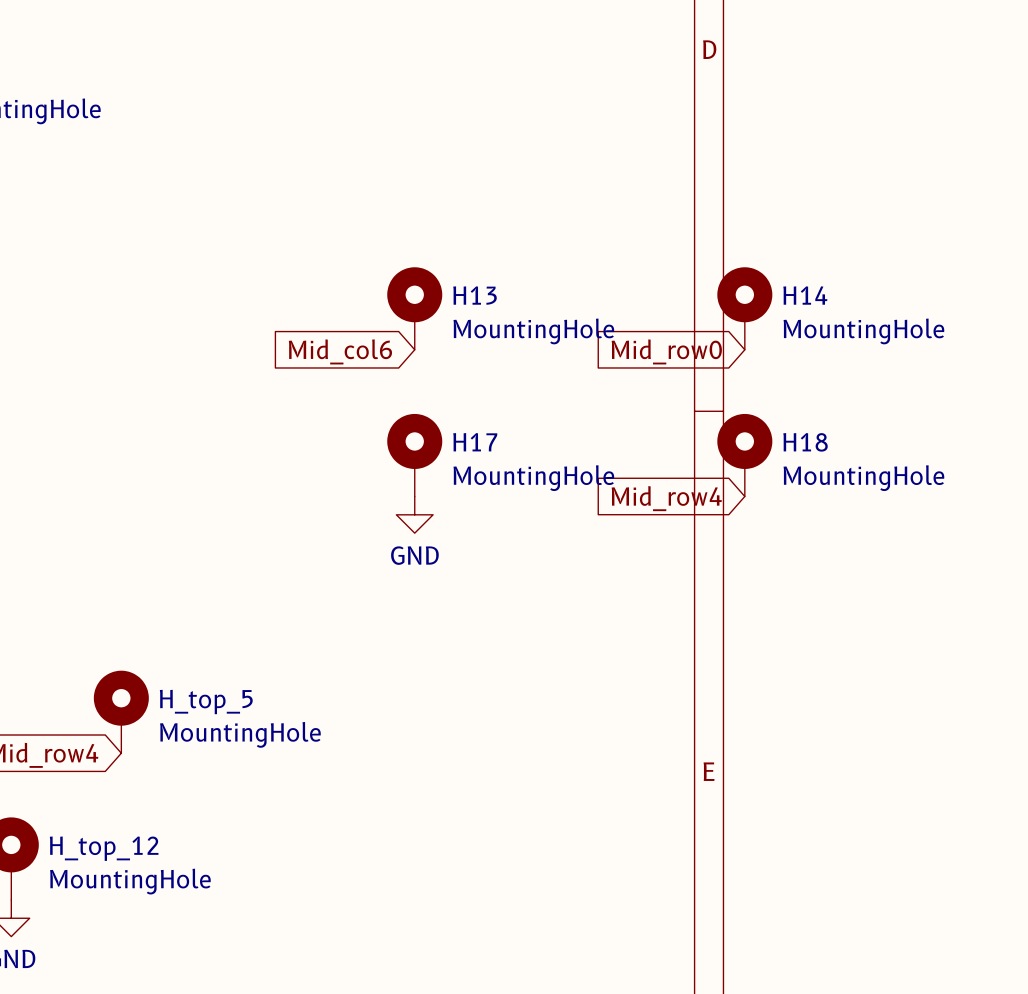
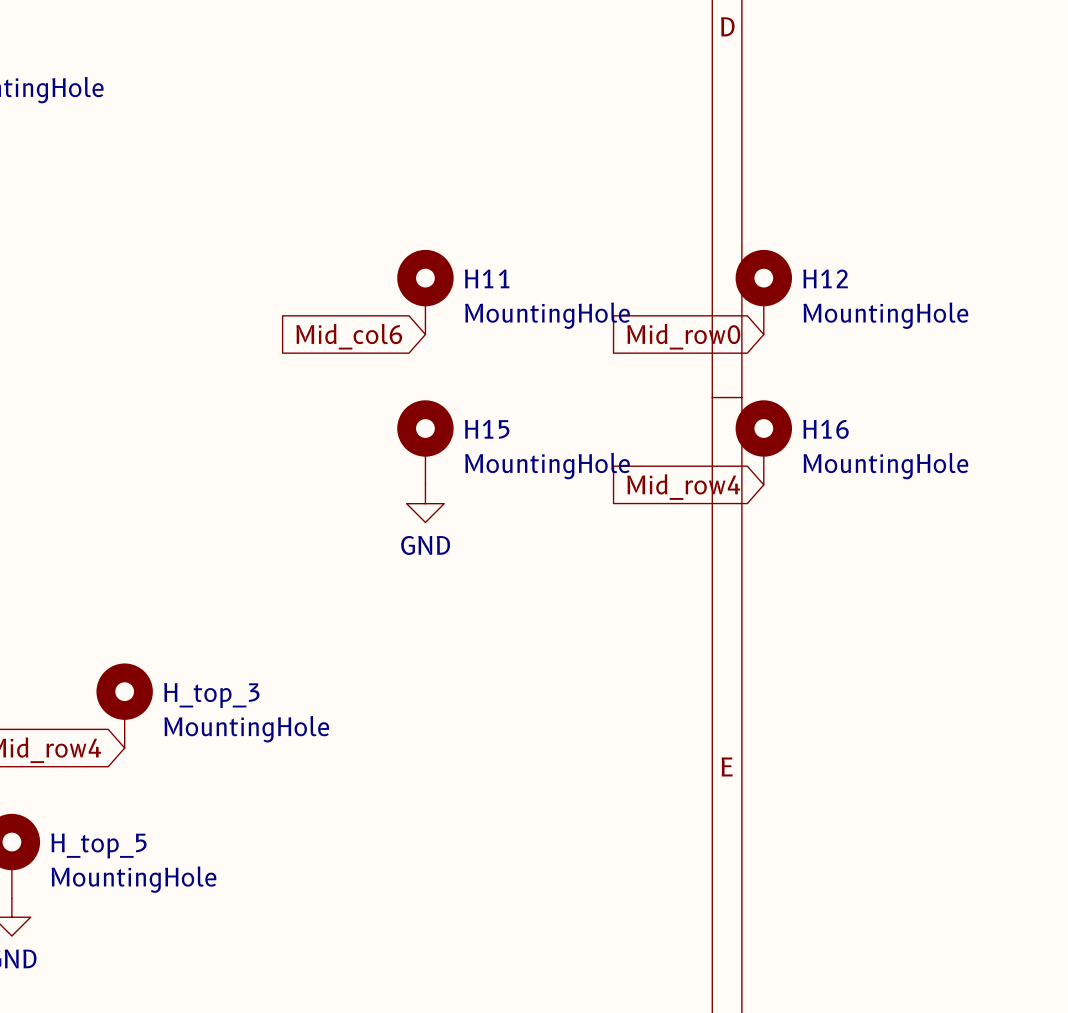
H13 name: H13 (475, 295) -> H11 (487, 278)
H14 name: H14 (805, 295) -> H12 (825, 278)
H17 name: H17 (475, 442) -> H15 (487, 429)
H18 name: H18 (805, 442) -> H16 (825, 429)
H_top_5 name: H_top_5 (206, 702) -> H_top_3 (211, 695)
H_top_12 name: H_top_12 (104, 848) -> H_top_5 (98, 845)

